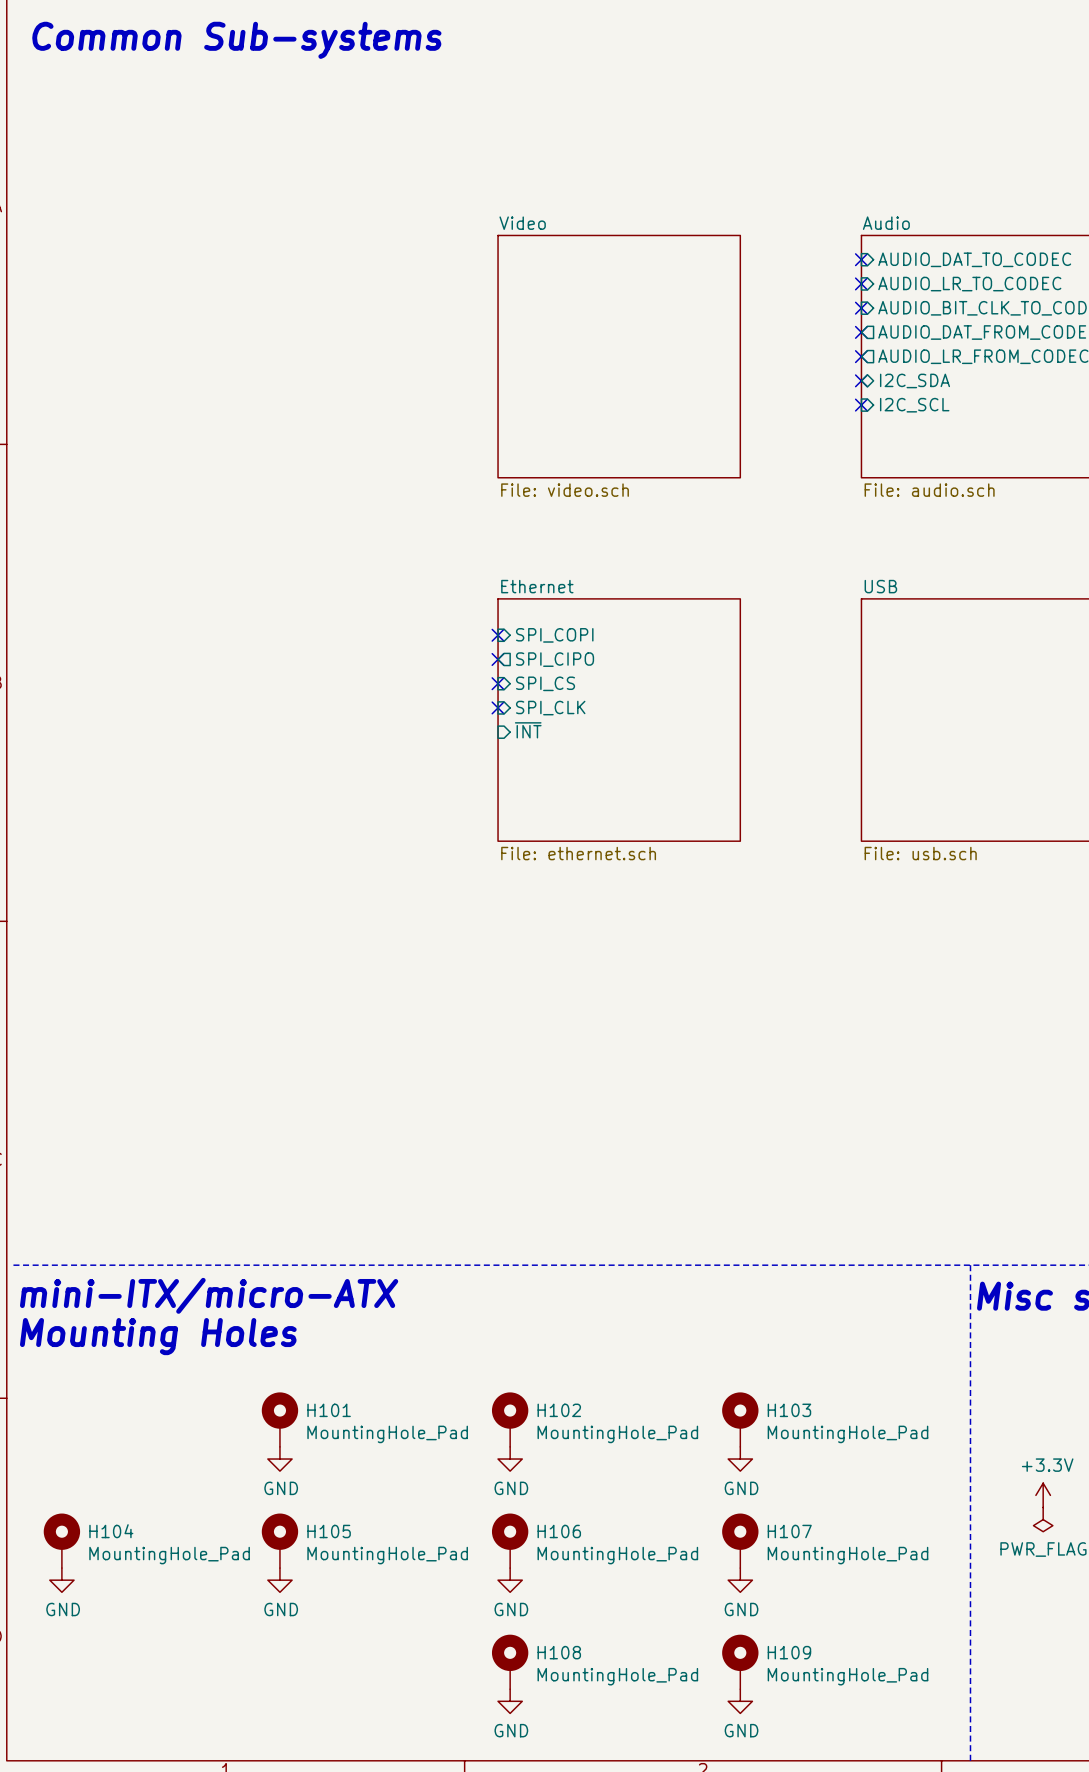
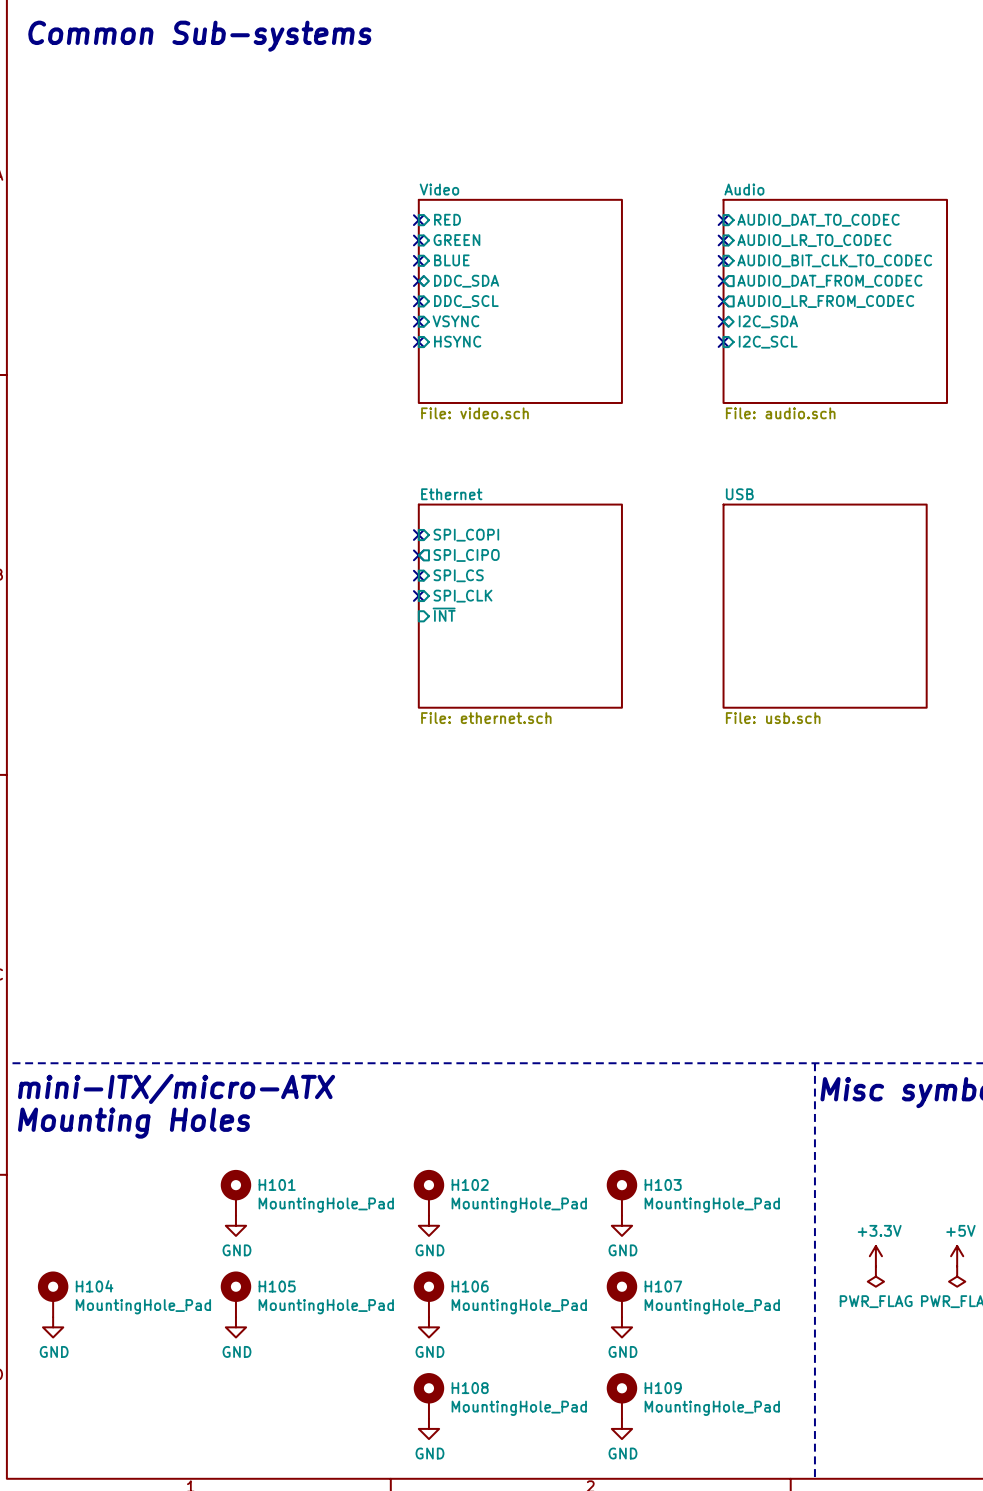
no-connect mark: none -> (418, 220)
sheet pin: none -> RED (447, 219)
no-connect mark: none -> (418, 240)
sheet pin: none -> GREEN (456, 240)
sheet pin: none -> BLUE (451, 260)
no-connect mark: none -> (418, 260)
no-connect mark: none -> (418, 281)
sheet pin: none -> DDC_SDA (466, 281)
no-connect mark: none -> (418, 301)
sheet pin: none -> DDC_SCL (466, 301)
no-connect mark: none -> (418, 321)
sheet pin: none -> VSYNC (455, 321)
sheet pin: none -> HSYNC (457, 341)
no-connect mark: none -> (418, 342)

